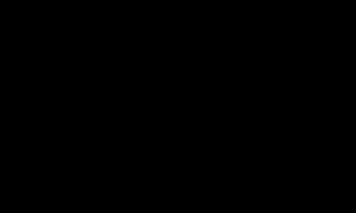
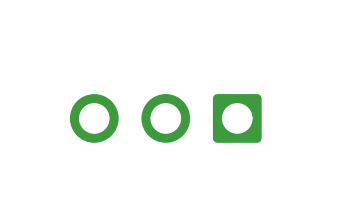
part: none -> (165, 118)

